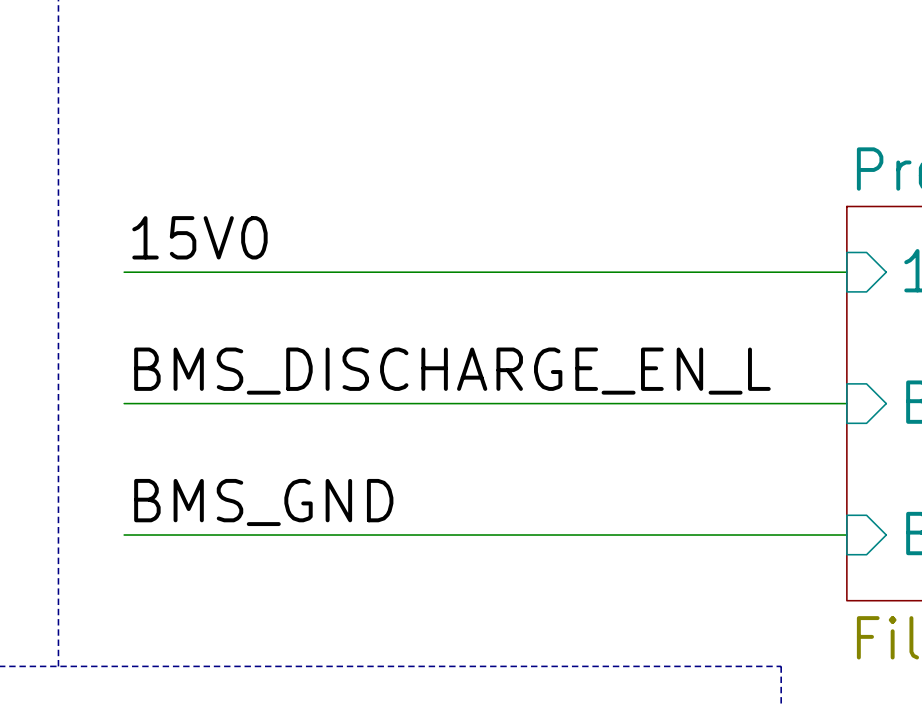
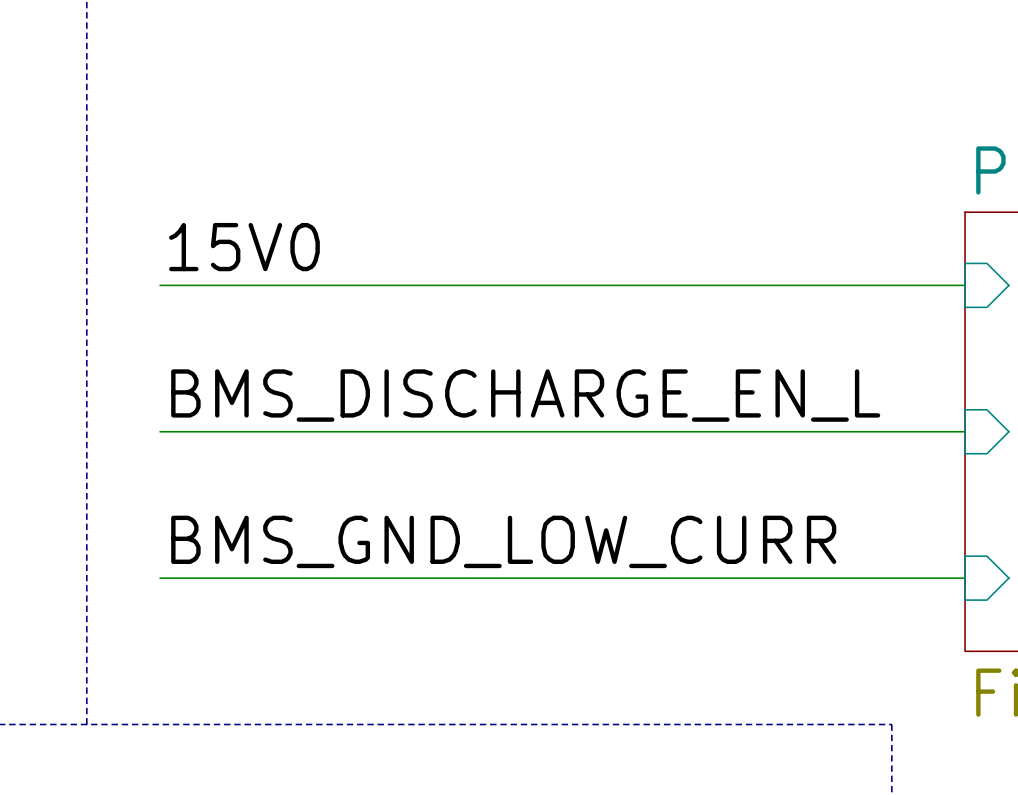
label: BMS_GND (263, 502) -> BMS_GND_LOW_CURR (503, 541)

